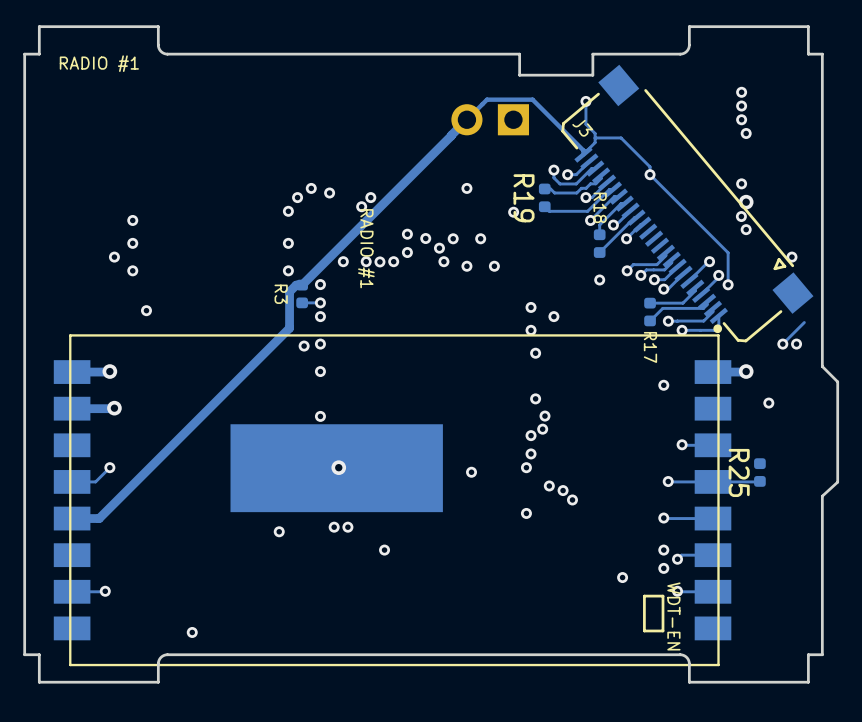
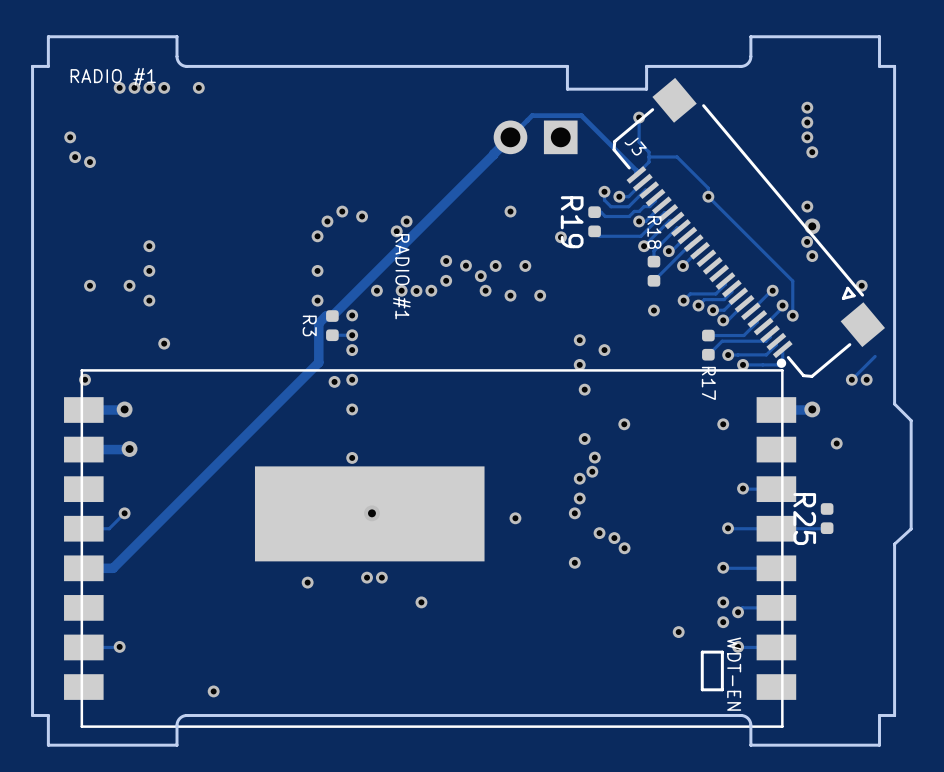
via: none -> (119, 87)
via: none -> (134, 87)
via: none -> (149, 87)
via: none -> (164, 87)
via: none -> (198, 87)
via: none -> (70, 137)
via: none -> (75, 157)
via: none -> (89, 162)
via: none -> (89, 285)
via: none -> (85, 379)
via: none -> (624, 424)

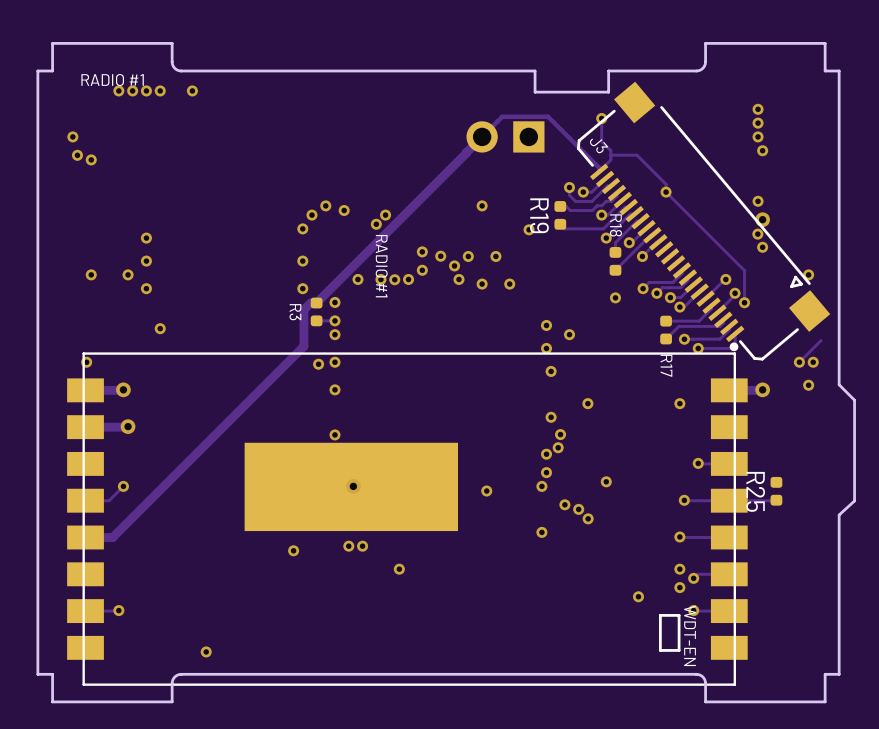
via position: (836, 443) -> (808, 385)
via: none -> (606, 481)

